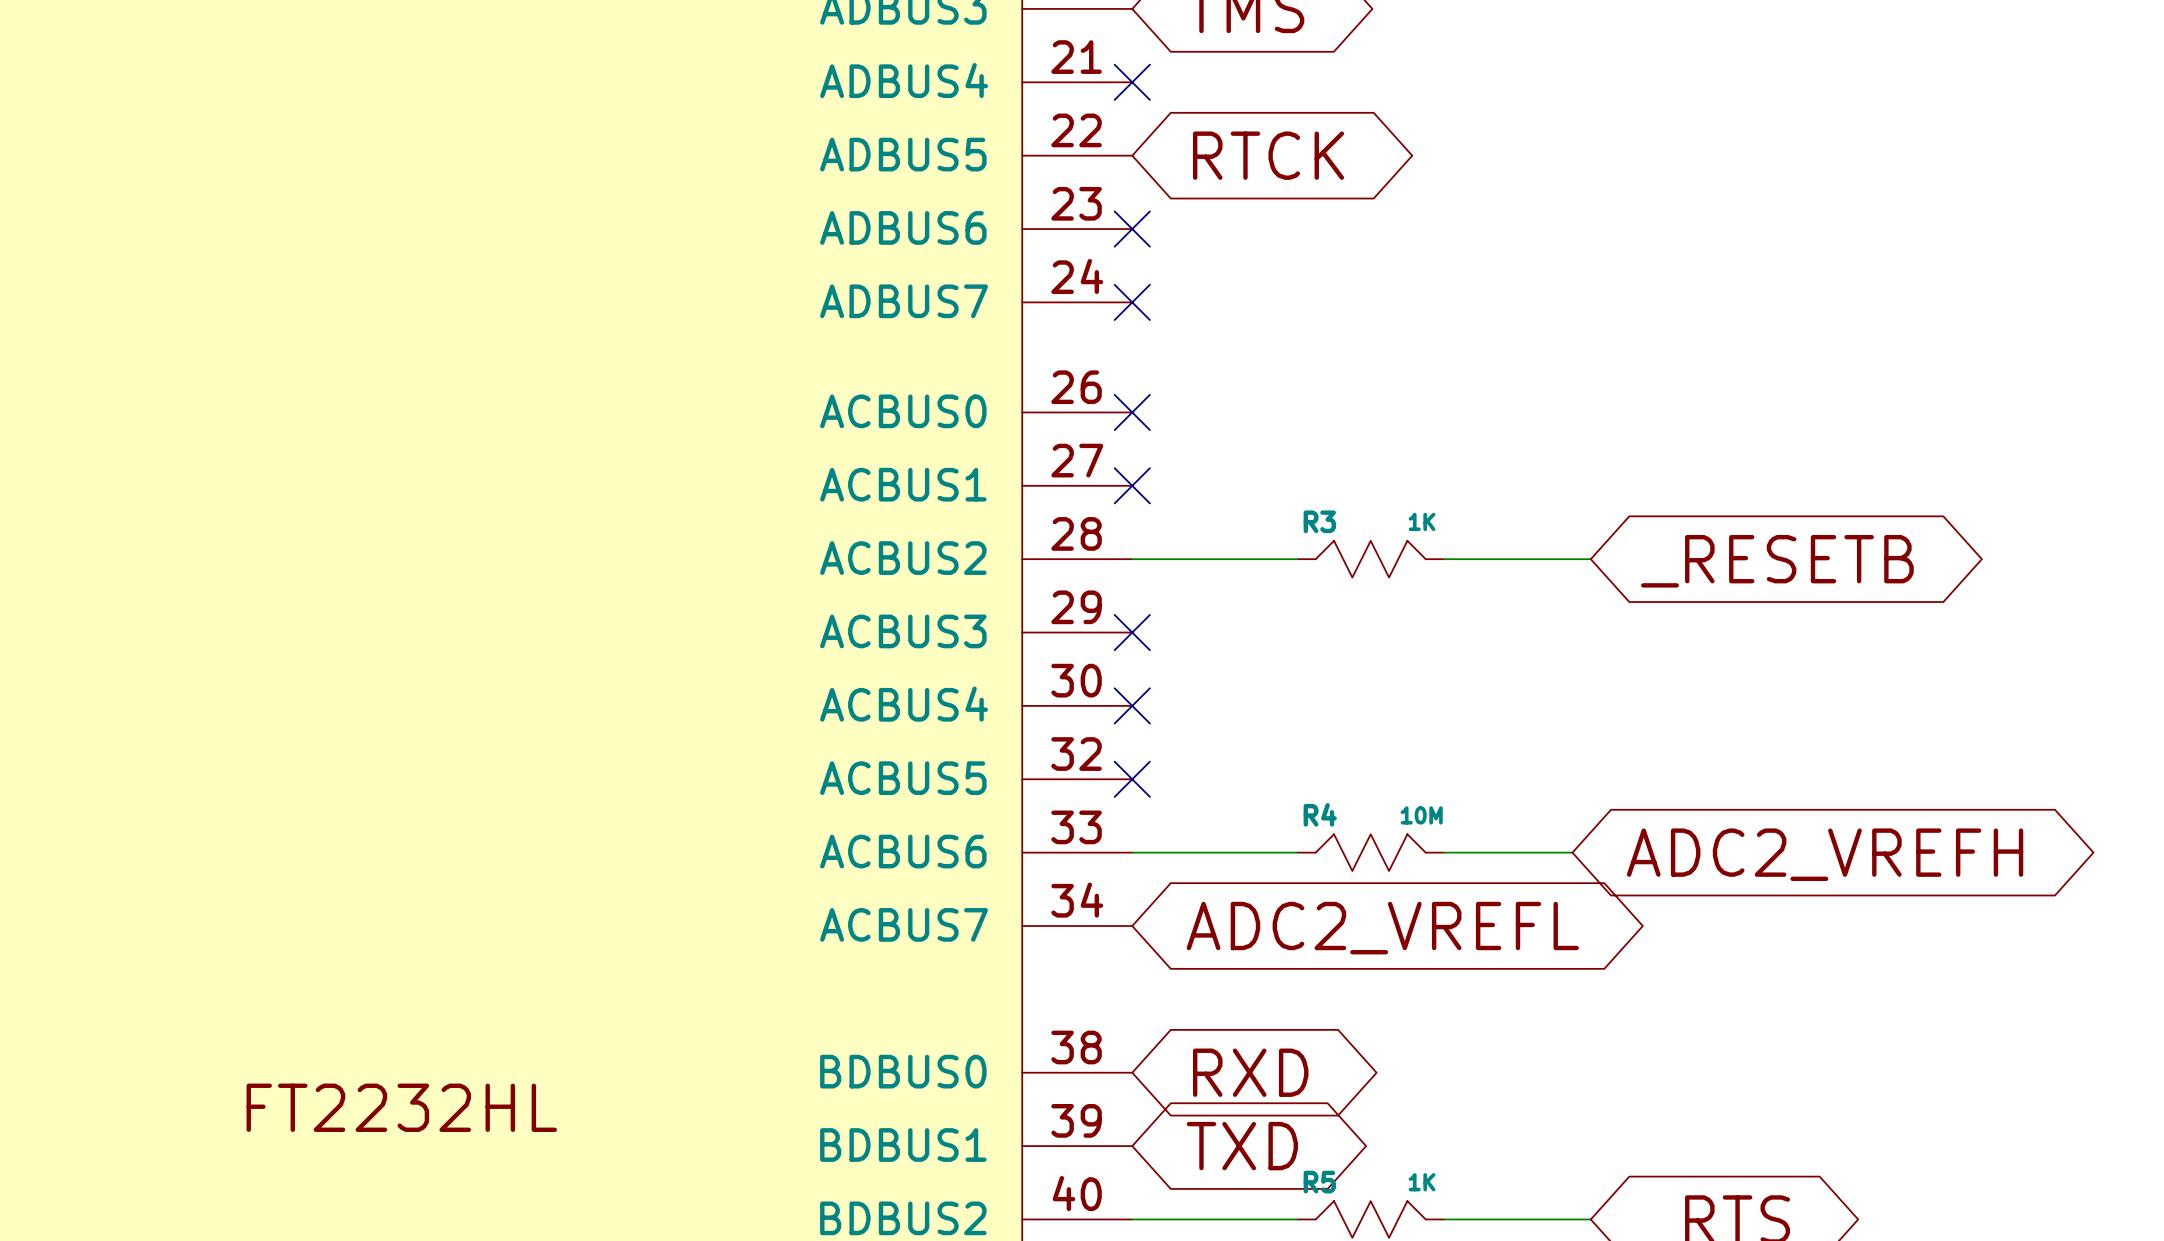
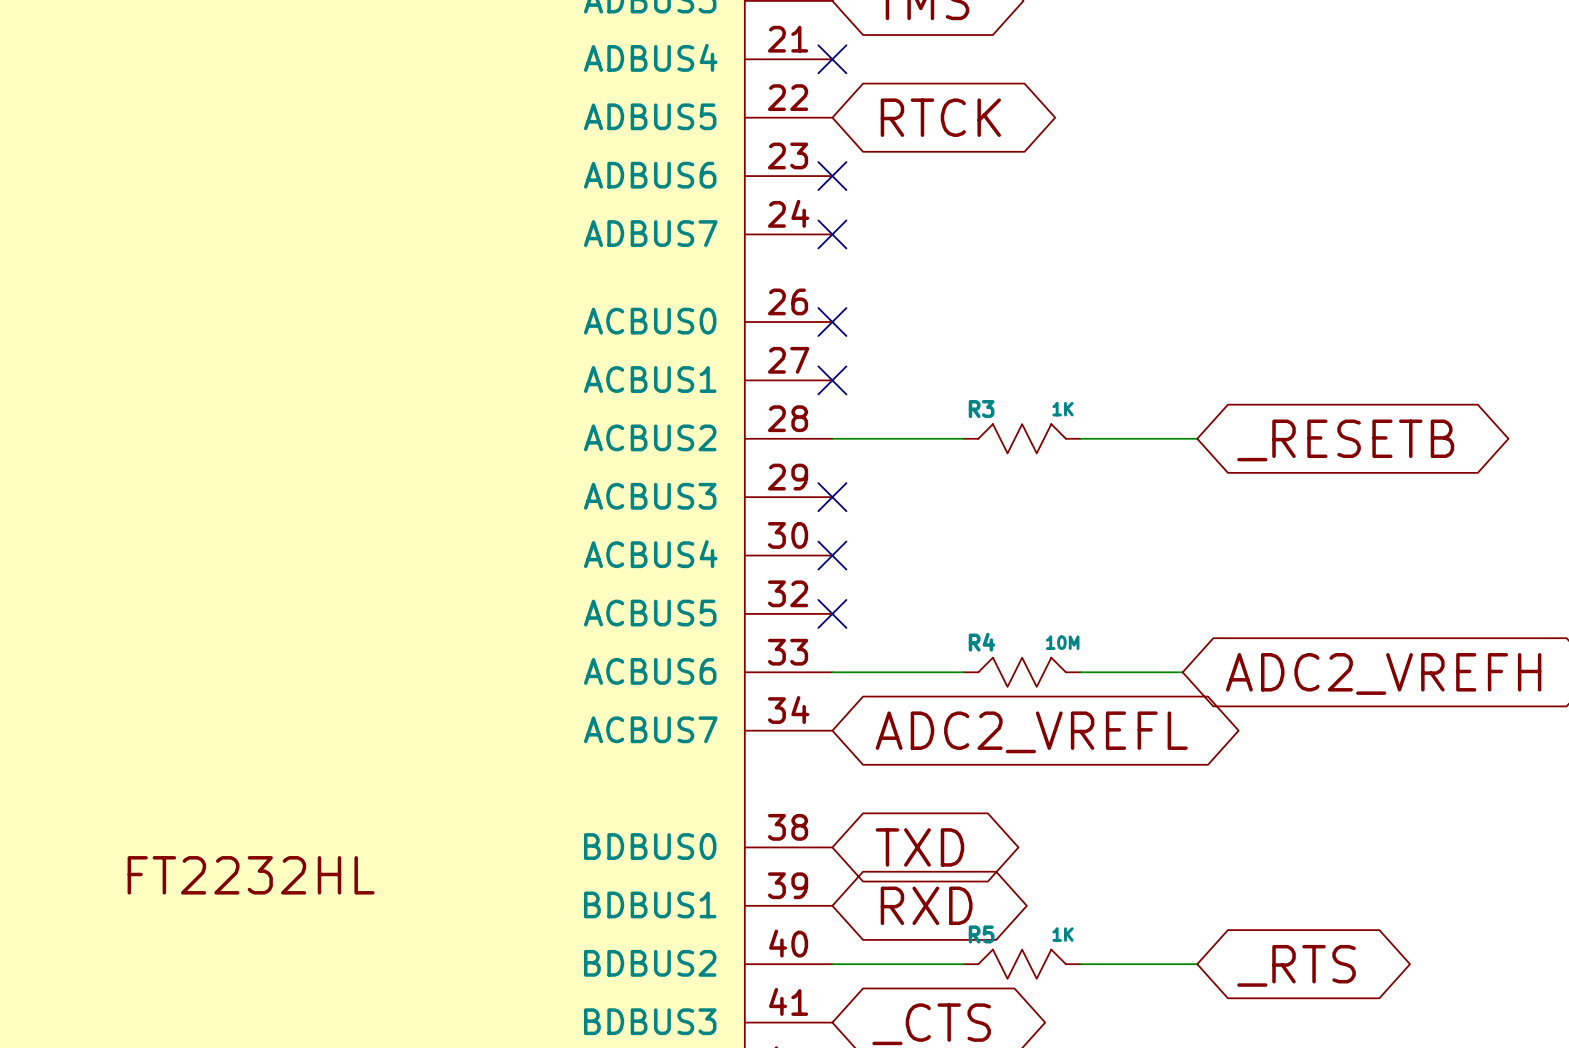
global label: RXD (1250, 1072) -> TXD (919, 847)
global label: TXD (1242, 1146) -> RXD (926, 905)

